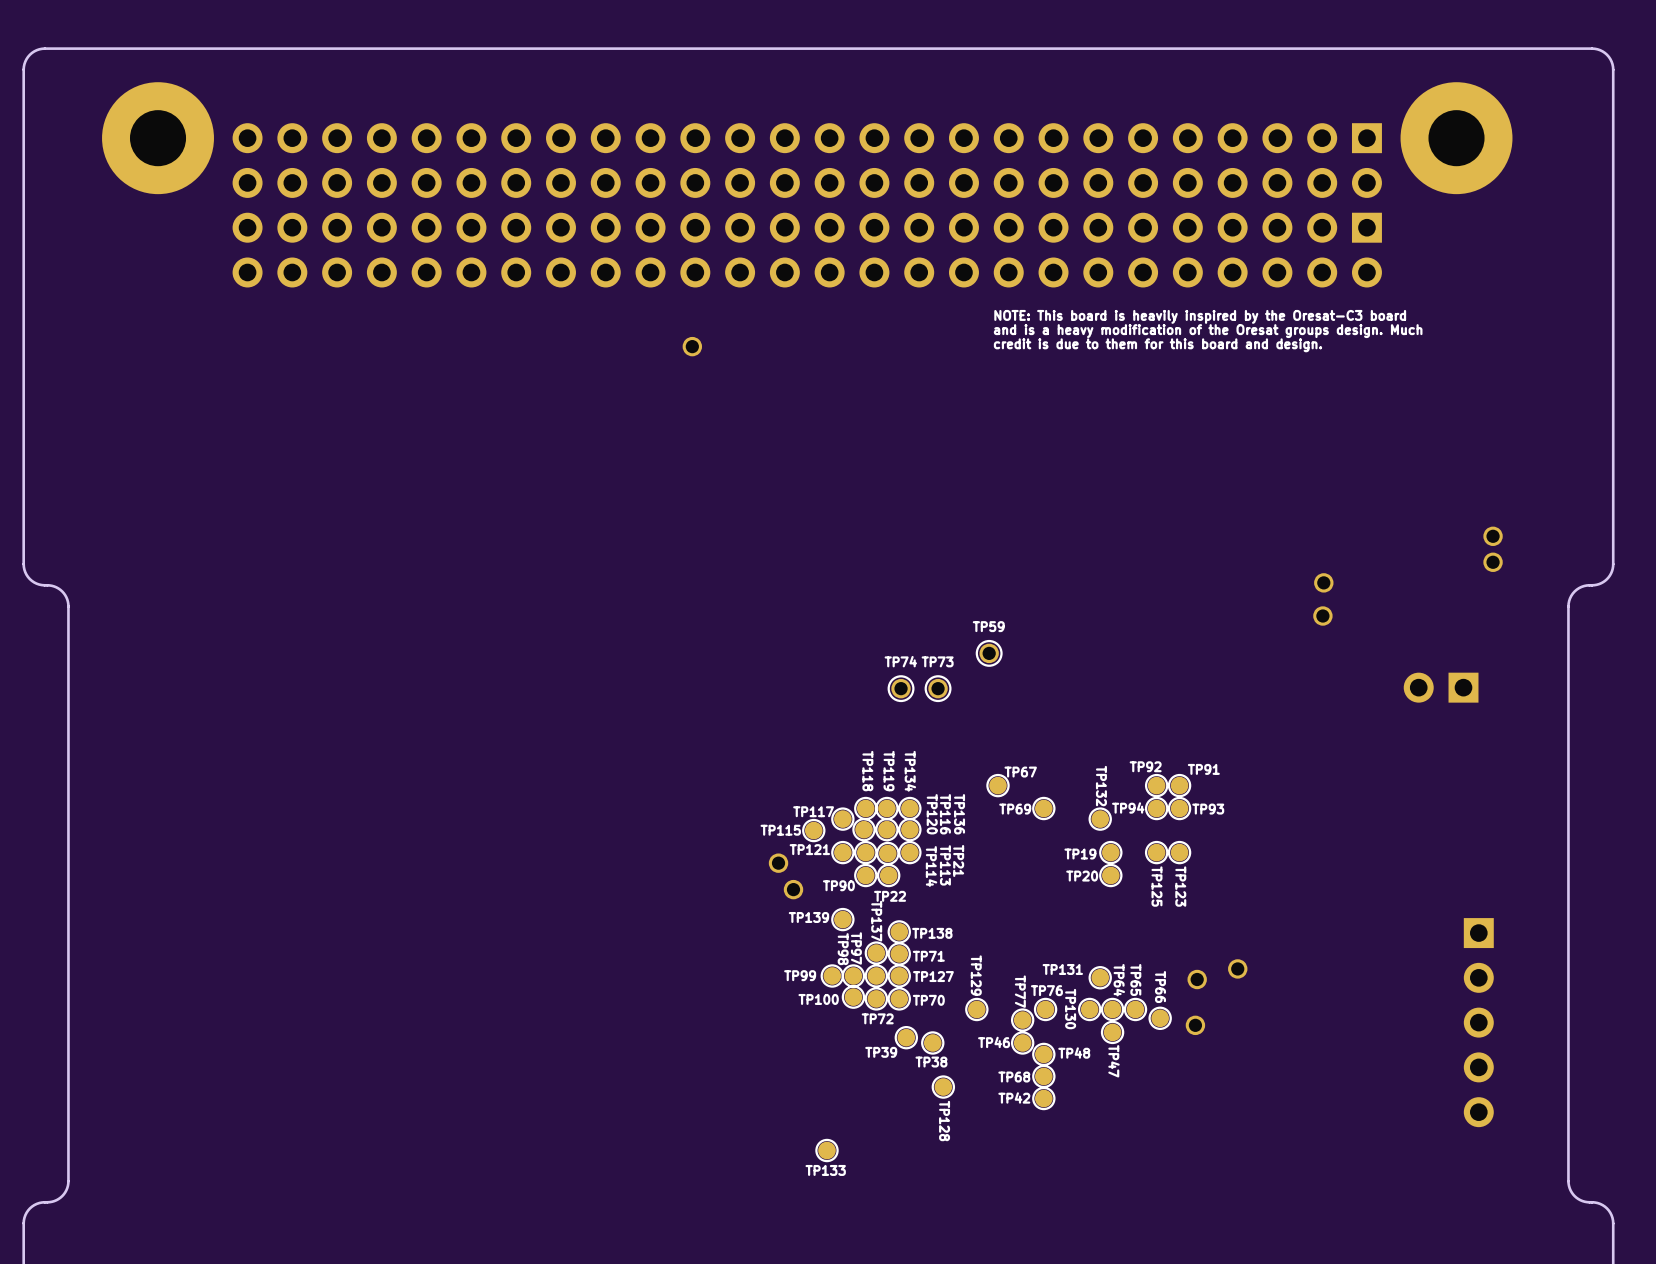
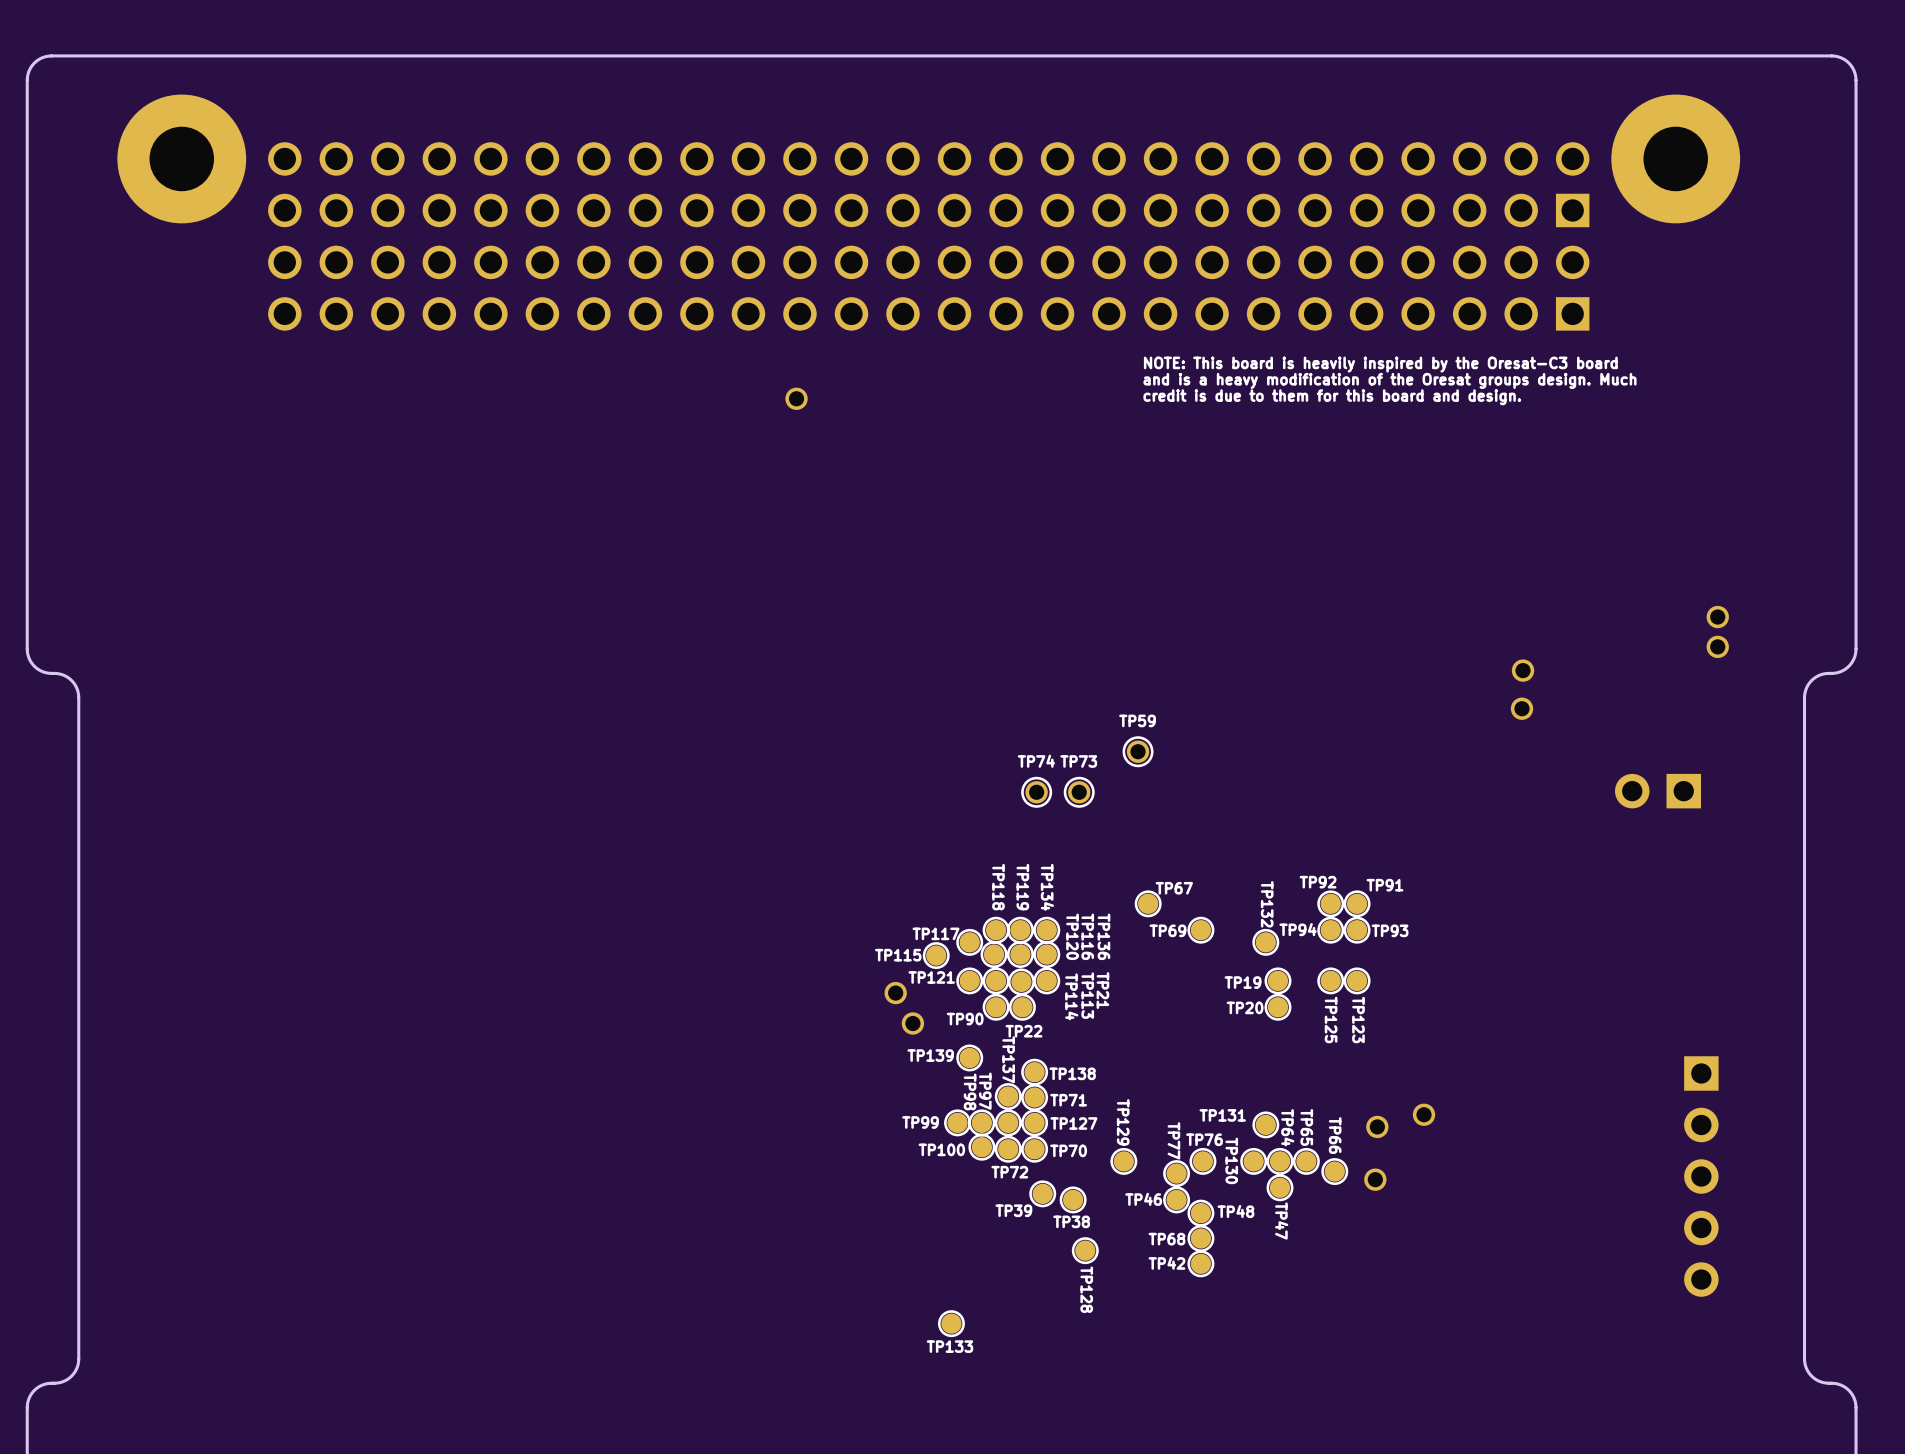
part footprint: [232, 123, 1382, 198] -> [268, 142, 1590, 228]
part footprint: [232, 212, 1382, 288] -> [268, 245, 1590, 331]

